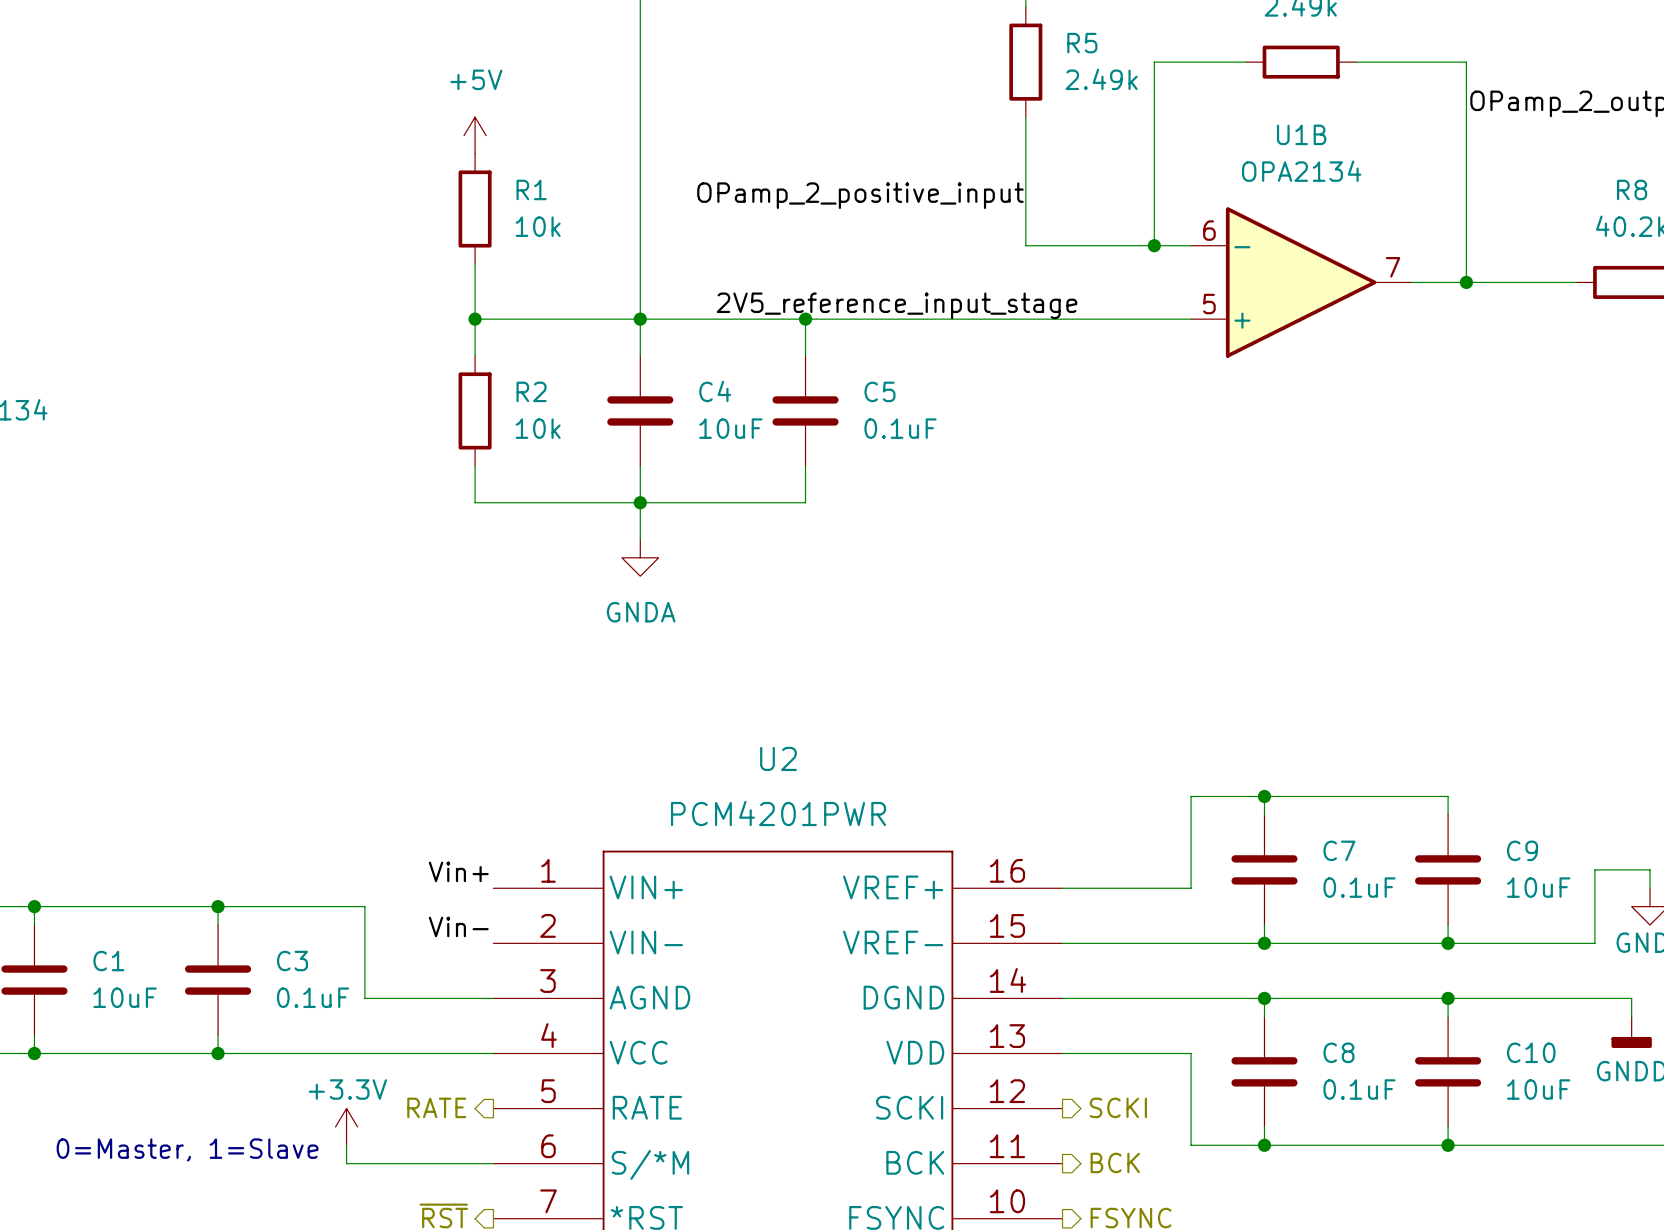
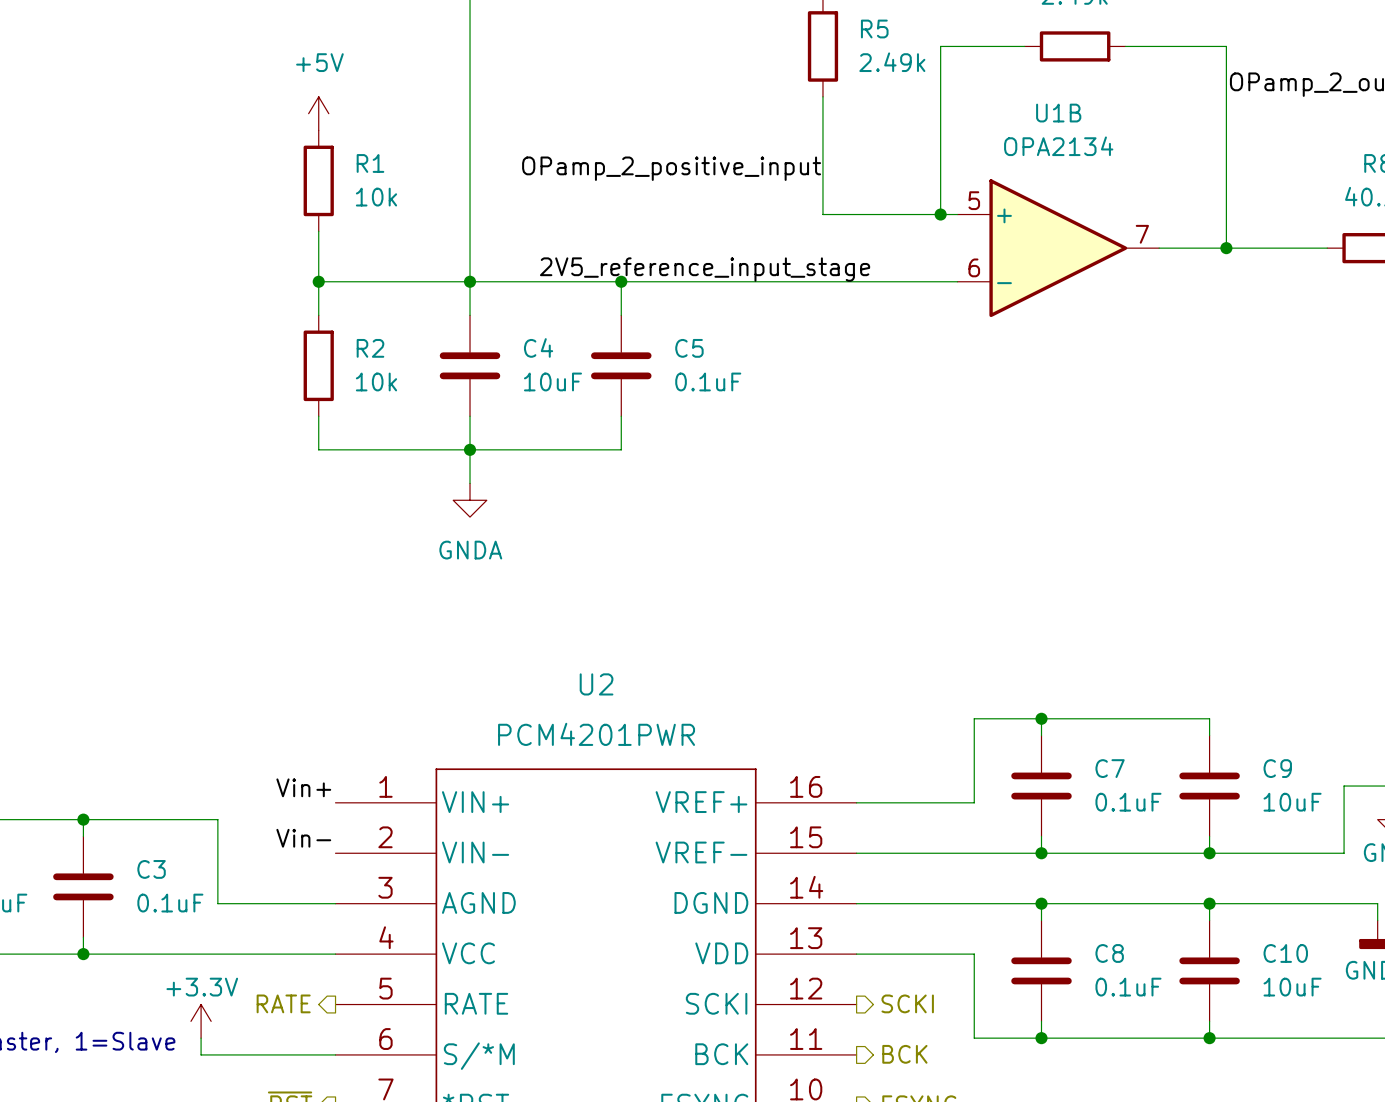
U1B flip: as is (1301, 282) -> up-down (1058, 248)

